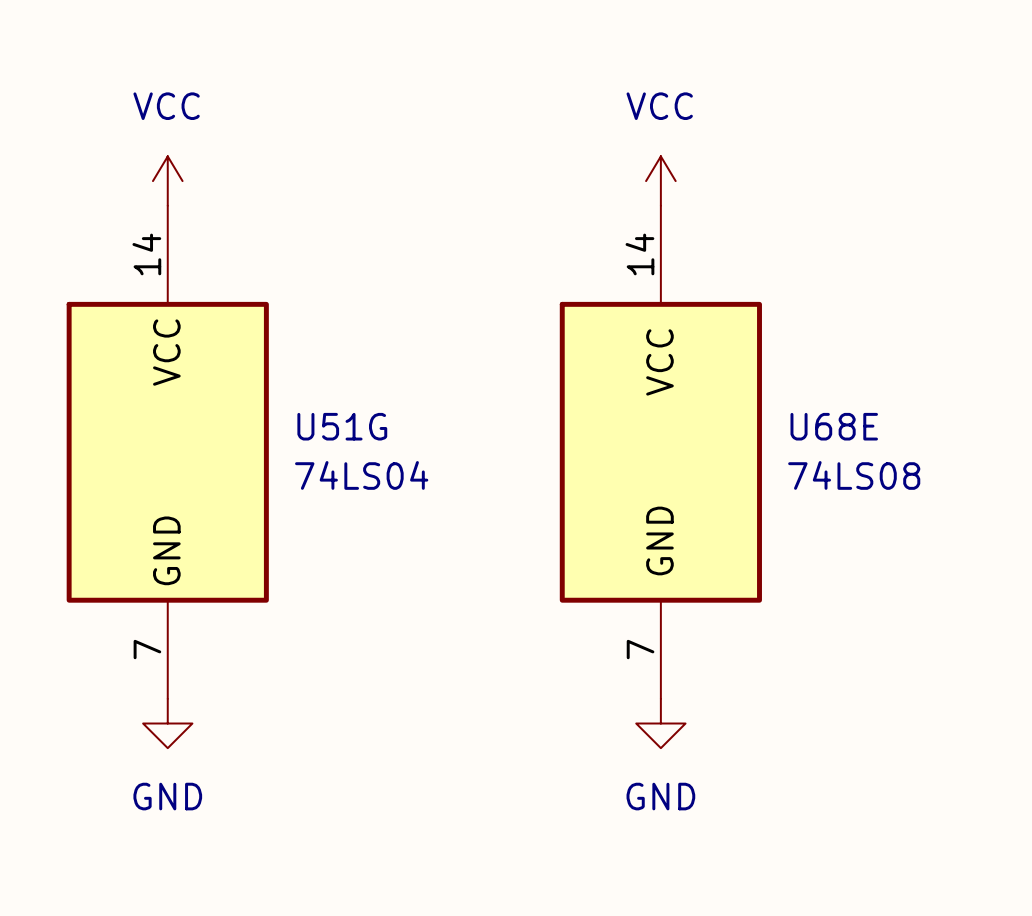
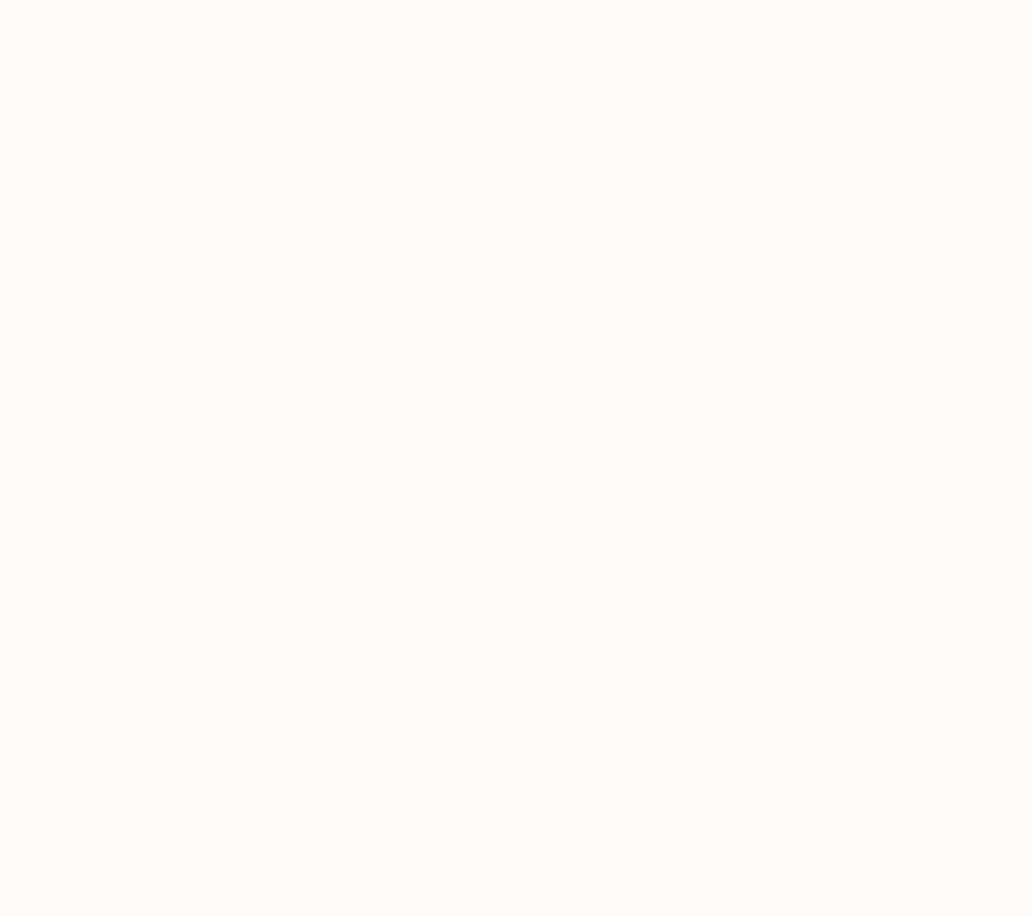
power symbol: VCC (167, 181) -> none
power symbol: VCC (660, 181) -> none
U51G: 74LS04 (167, 452) -> none
U68E: 74LS08 (660, 452) -> none
power symbol: GND (167, 723) -> none
power symbol: GND (660, 723) -> none

